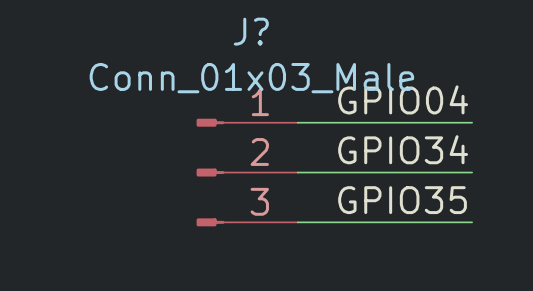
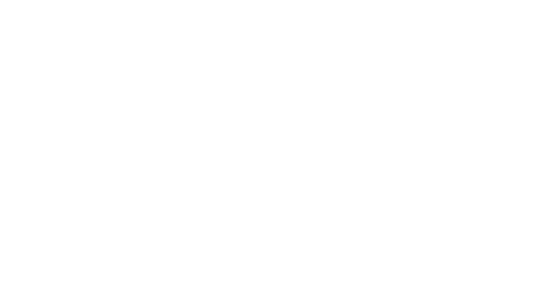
label: GPIO04 (403, 99) -> none
wire: (297, 122) (472, 122) -> none
label: GPIO34 (403, 149) -> none
J?: Conn_01x03_Male (247, 172) -> none
wire: (297, 172) (472, 172) -> none
label: GPIO35 (402, 200) -> none
wire: (297, 222) (472, 222) -> none

